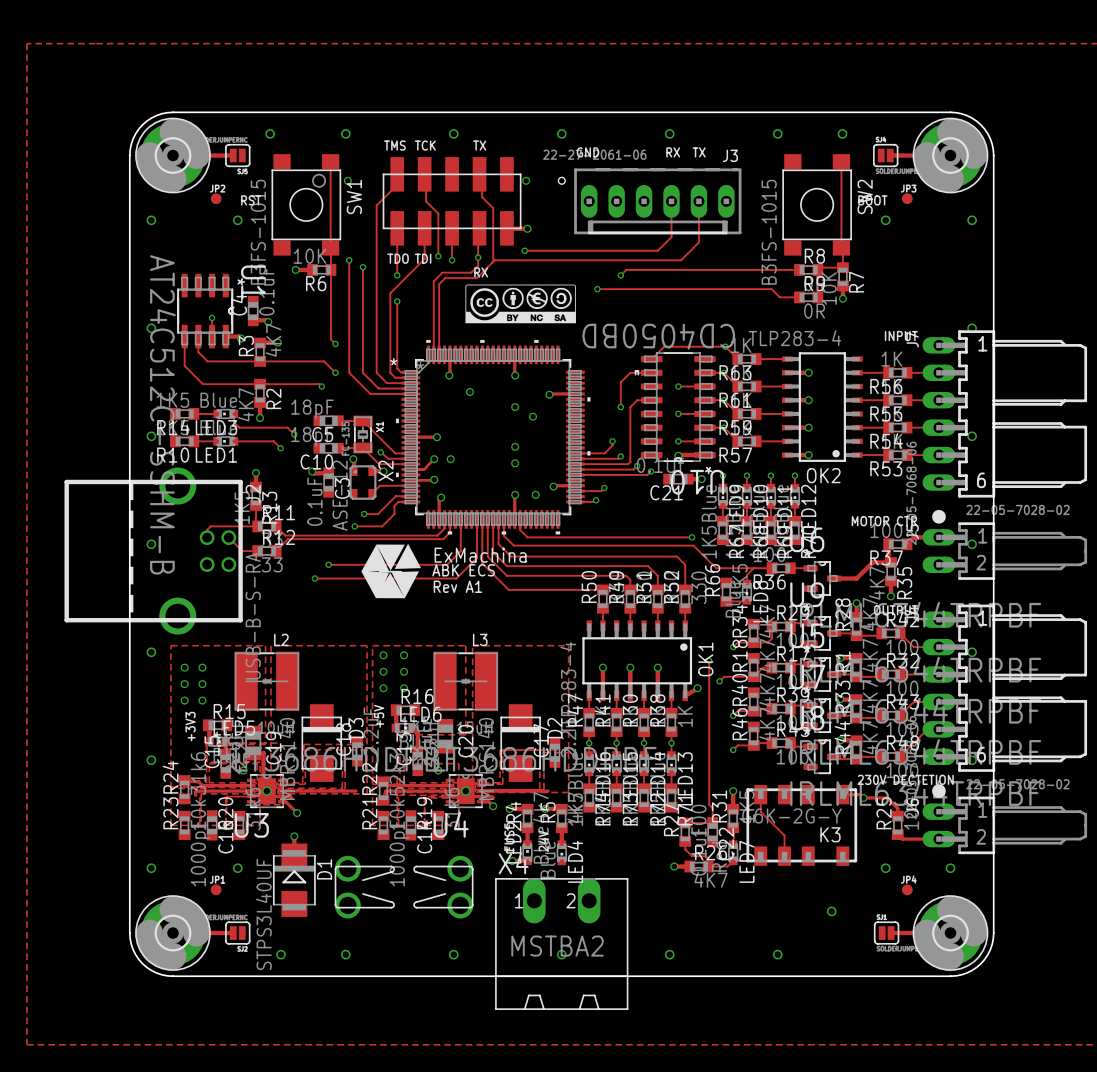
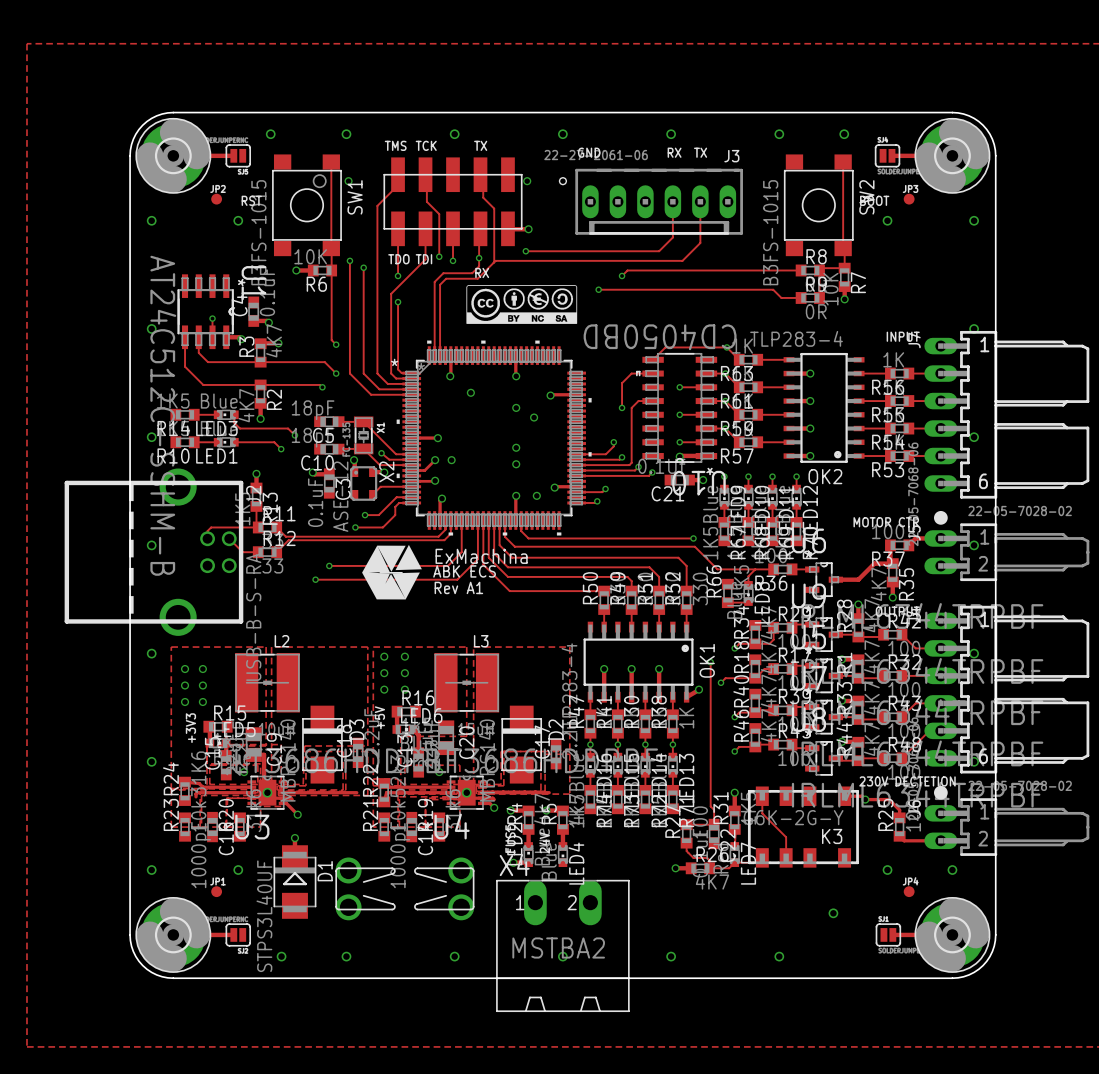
R24 value: 31k6 (198, 773) -> 31K6 (198, 773)

